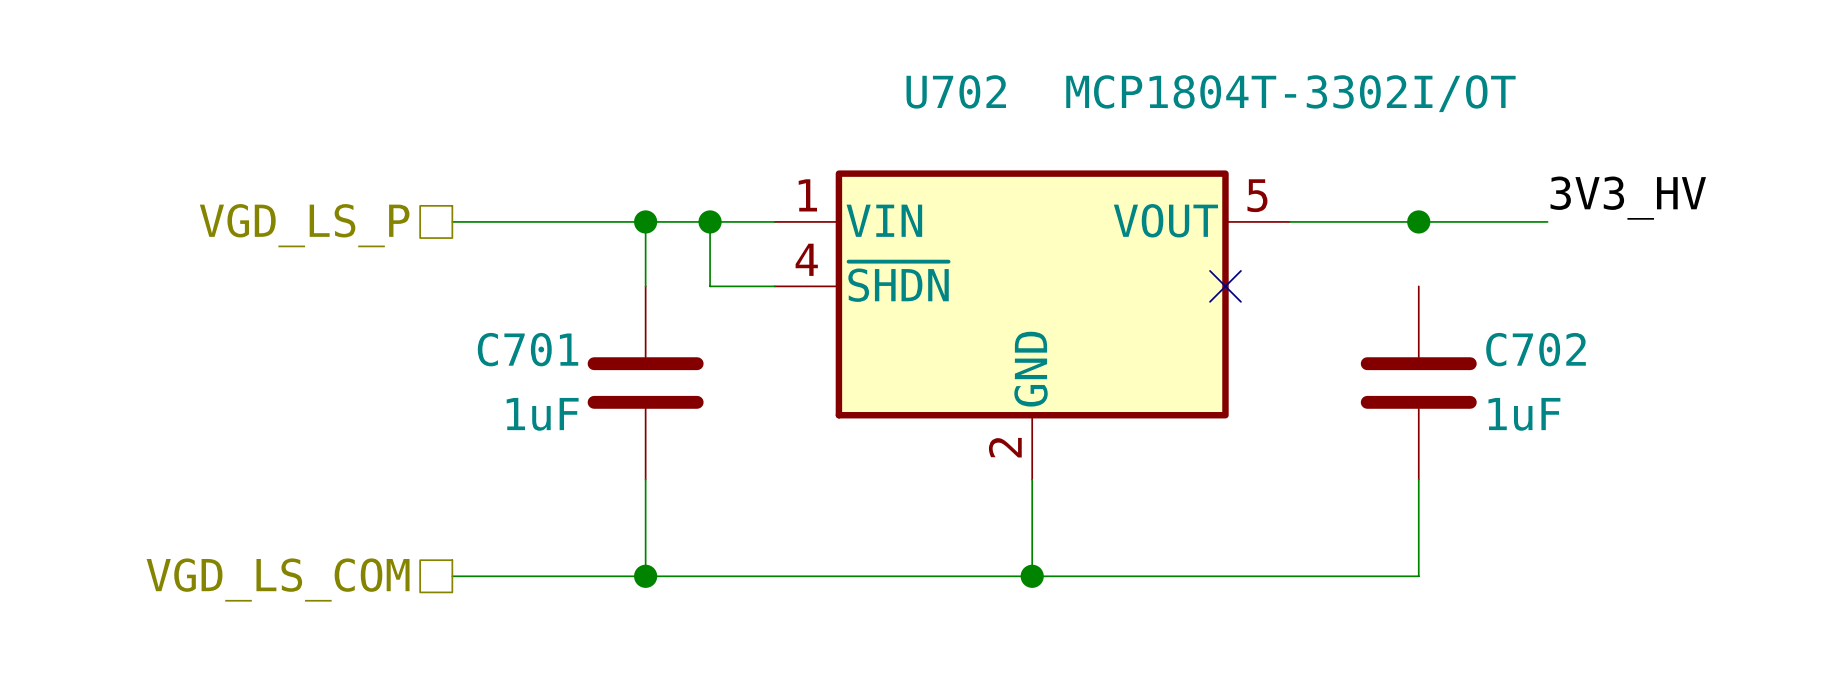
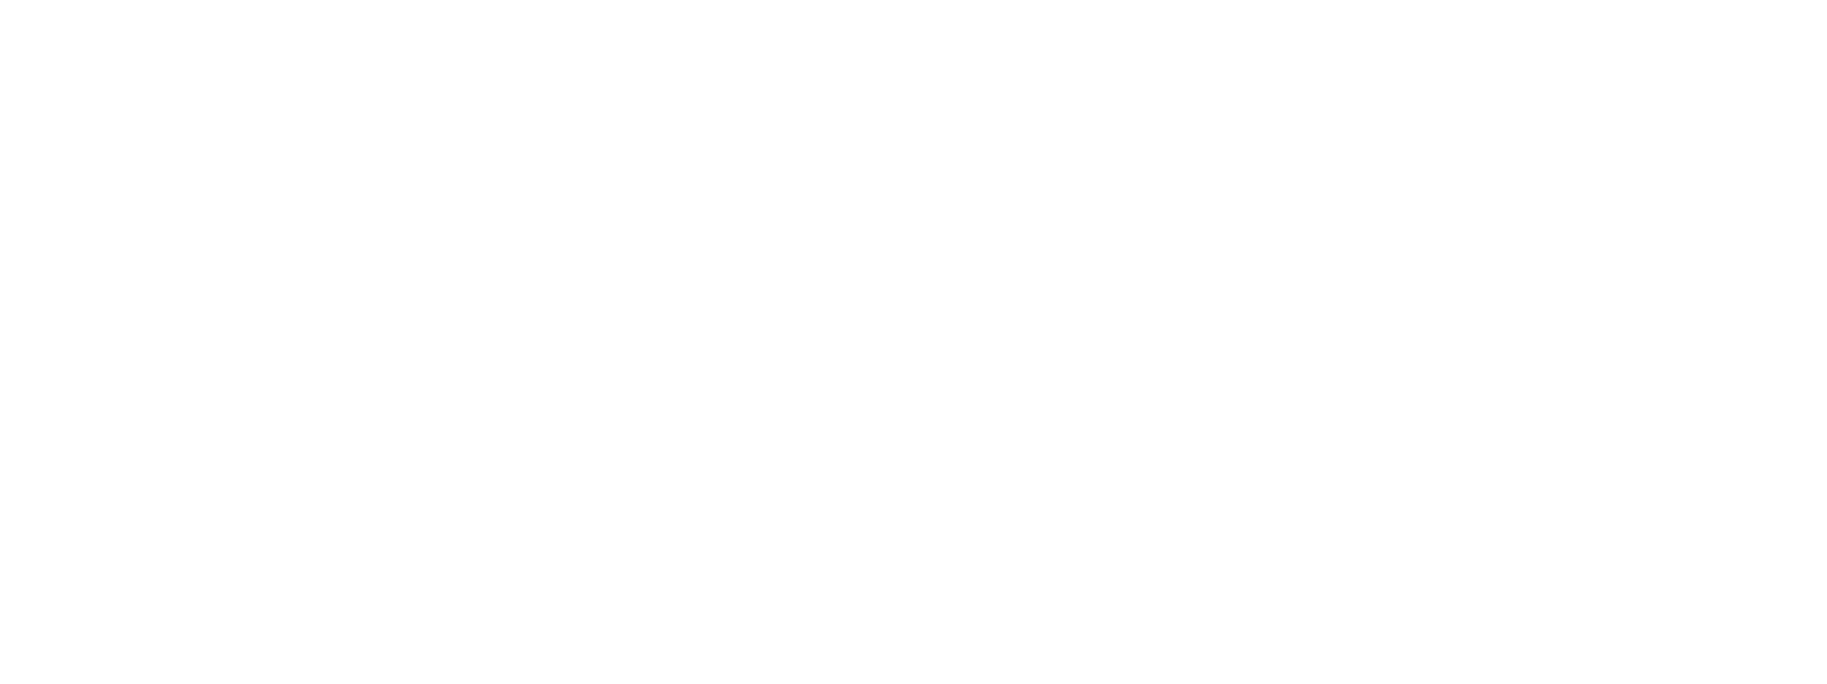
label: 3V3_HV (1628, 198) -> none
wire: (452, 221) (774, 221) -> none
wire: (645, 221) (645, 286) -> none
junction: (645, 221) -> none
wire: (710, 221) (710, 286) (774, 286) -> none
junction: (710, 221) -> none
wire: (1289, 221) (1547, 221) -> none
junction: (1418, 221) -> none
hierarchical label: VGD_LS_P (304, 225) -> none
no-connect mark: (1225, 286) -> none
U702: MCP1804T-3302I/OT (1032, 325) -> none
C701: 1uF (645, 383) -> none
C702: 1uF (1418, 383) -> none
wire: (645, 479) (645, 576) -> none
wire: (1032, 479) (1032, 576) -> none
wire: (1418, 479) (1418, 576) (452, 576) -> none
junction: (645, 576) -> none
junction: (1032, 576) -> none
hierarchical label: VGD_LS_COM (278, 580) -> none

